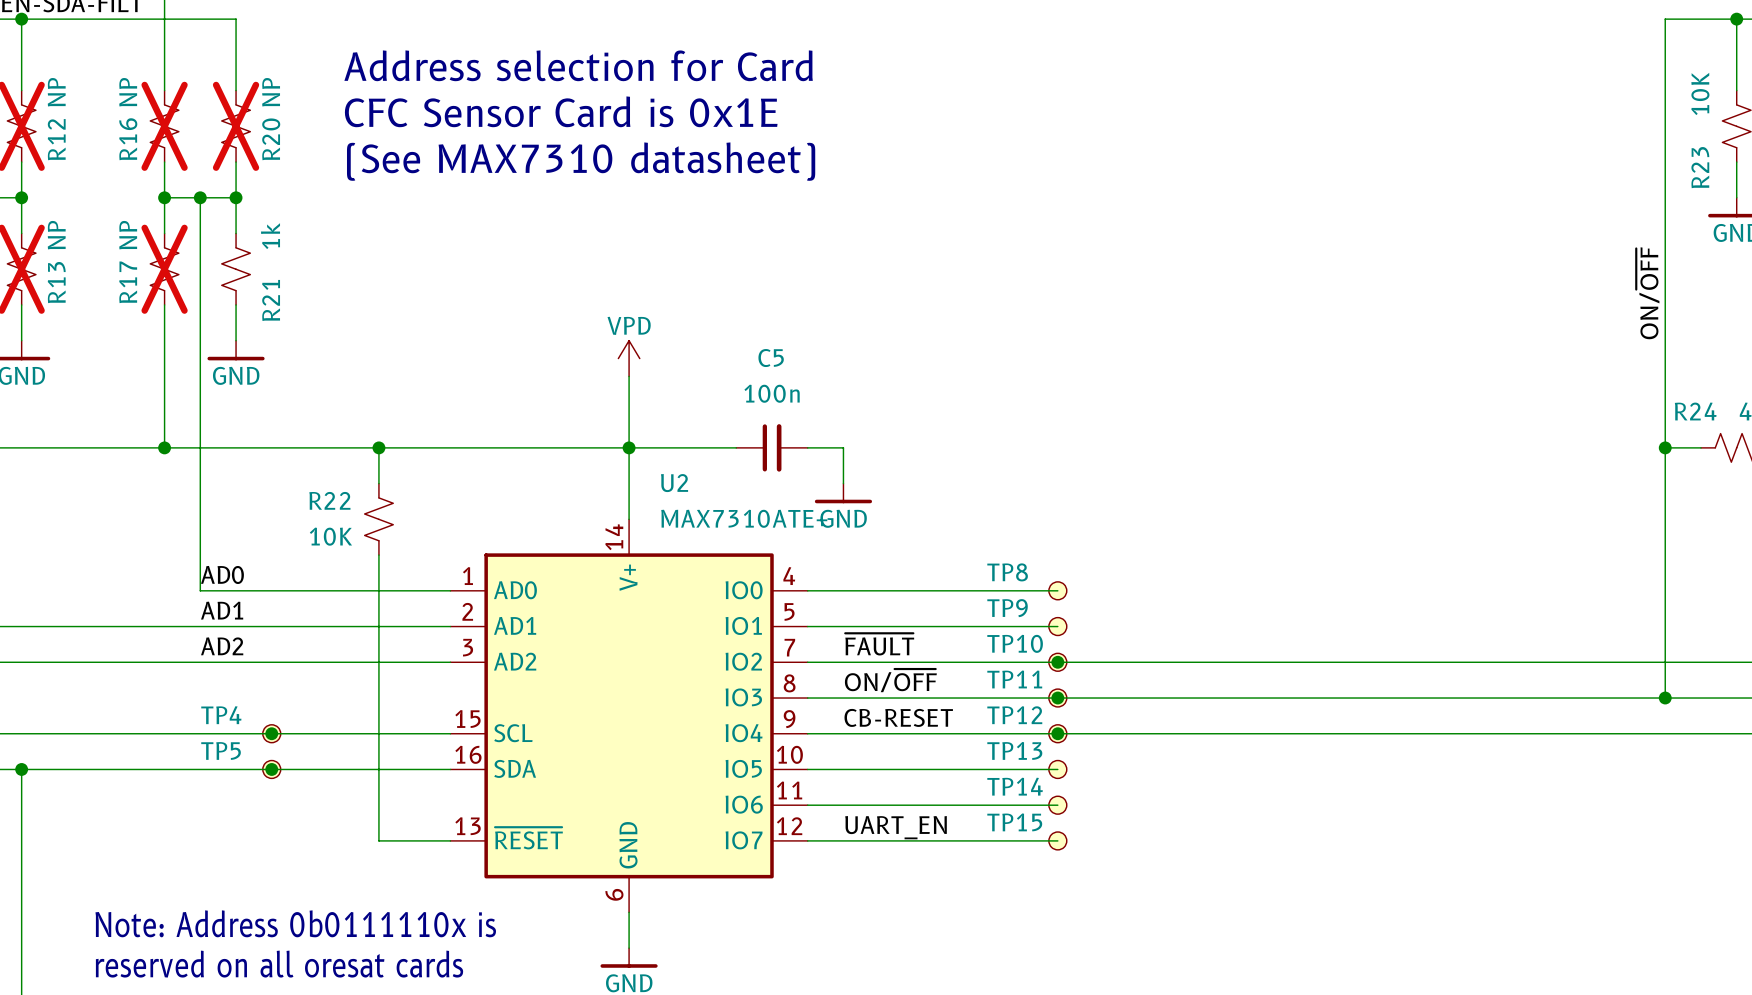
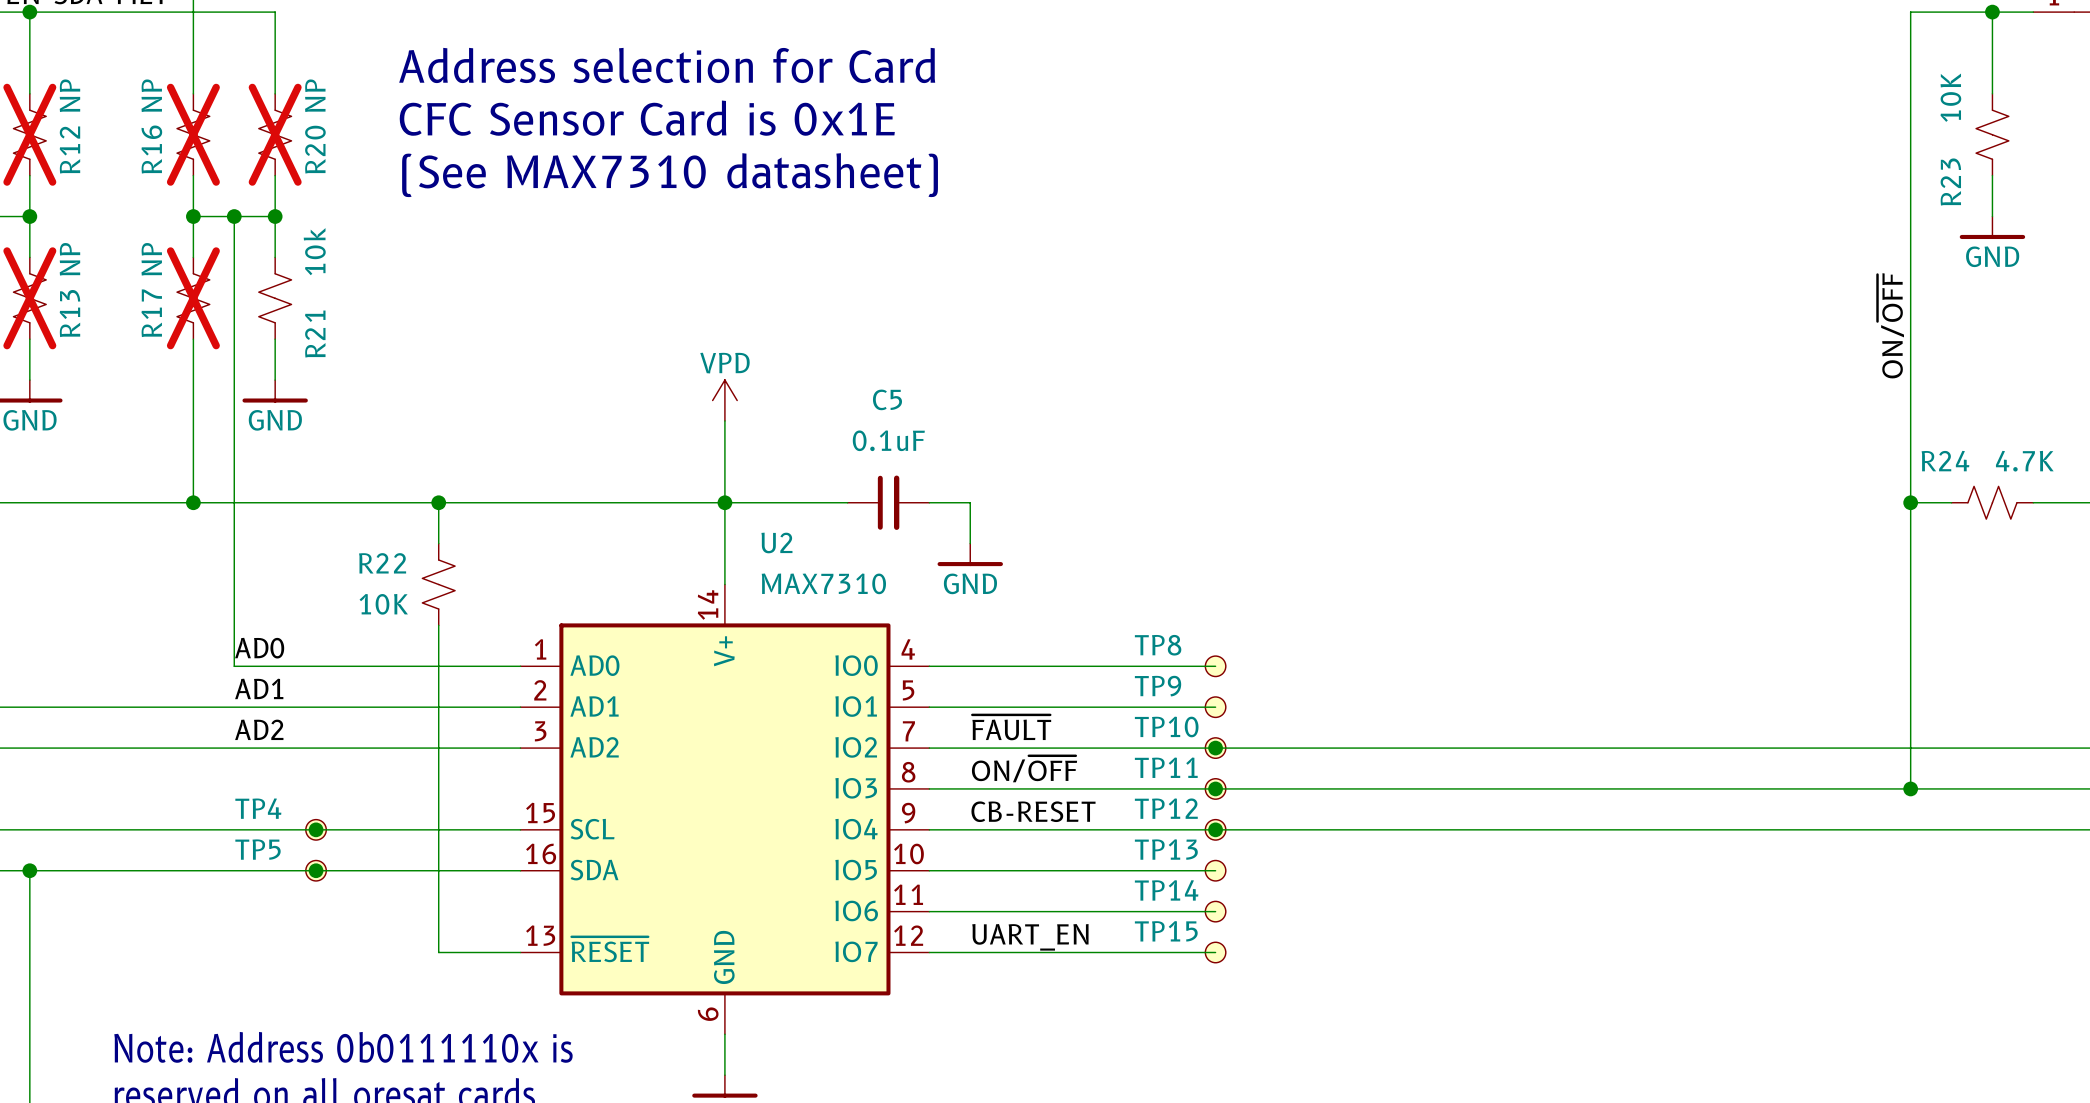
R21 value: 1k (270, 236) -> 10k (314, 251)
C5 value: 100n (772, 393) -> 0.1uF (888, 440)
U2 value: MAX7310ATE+ (744, 518) -> MAX7310 (823, 583)

